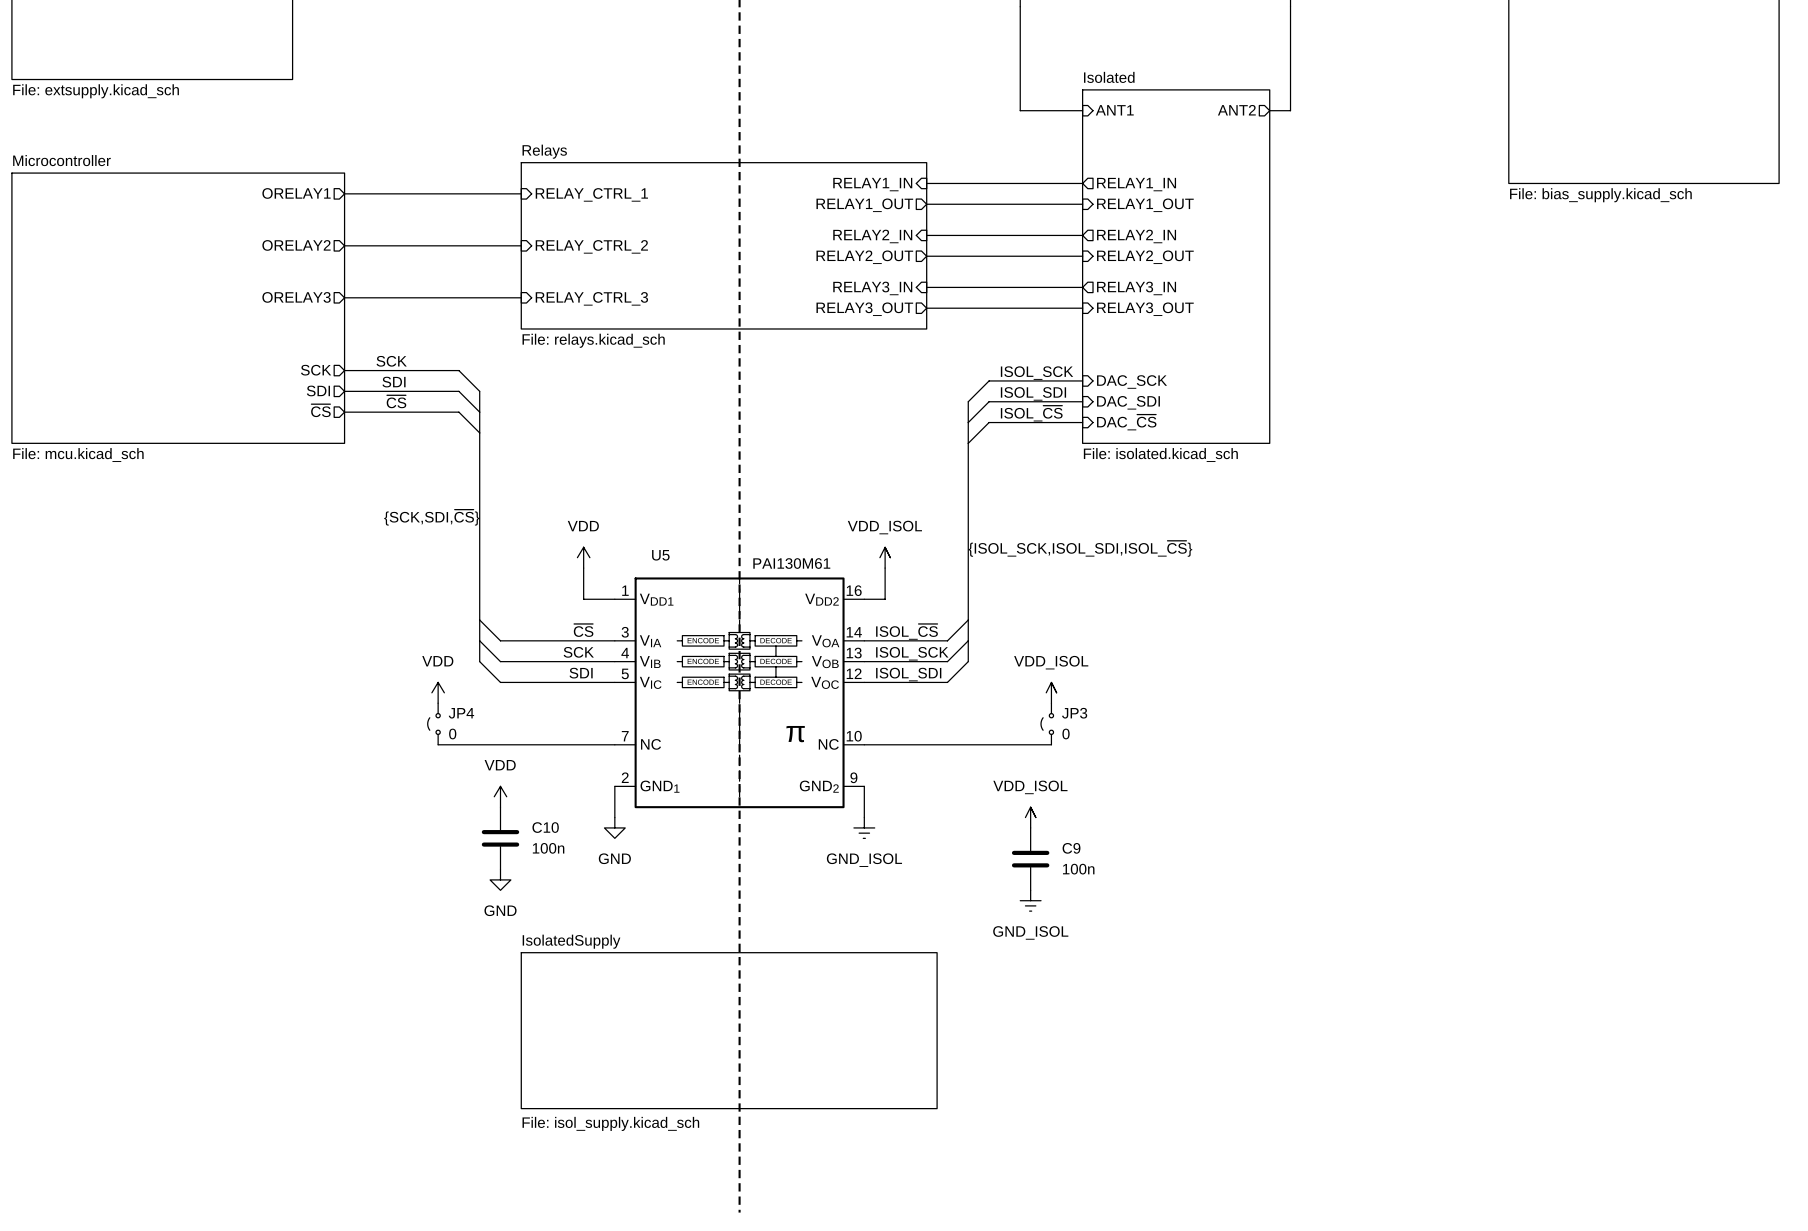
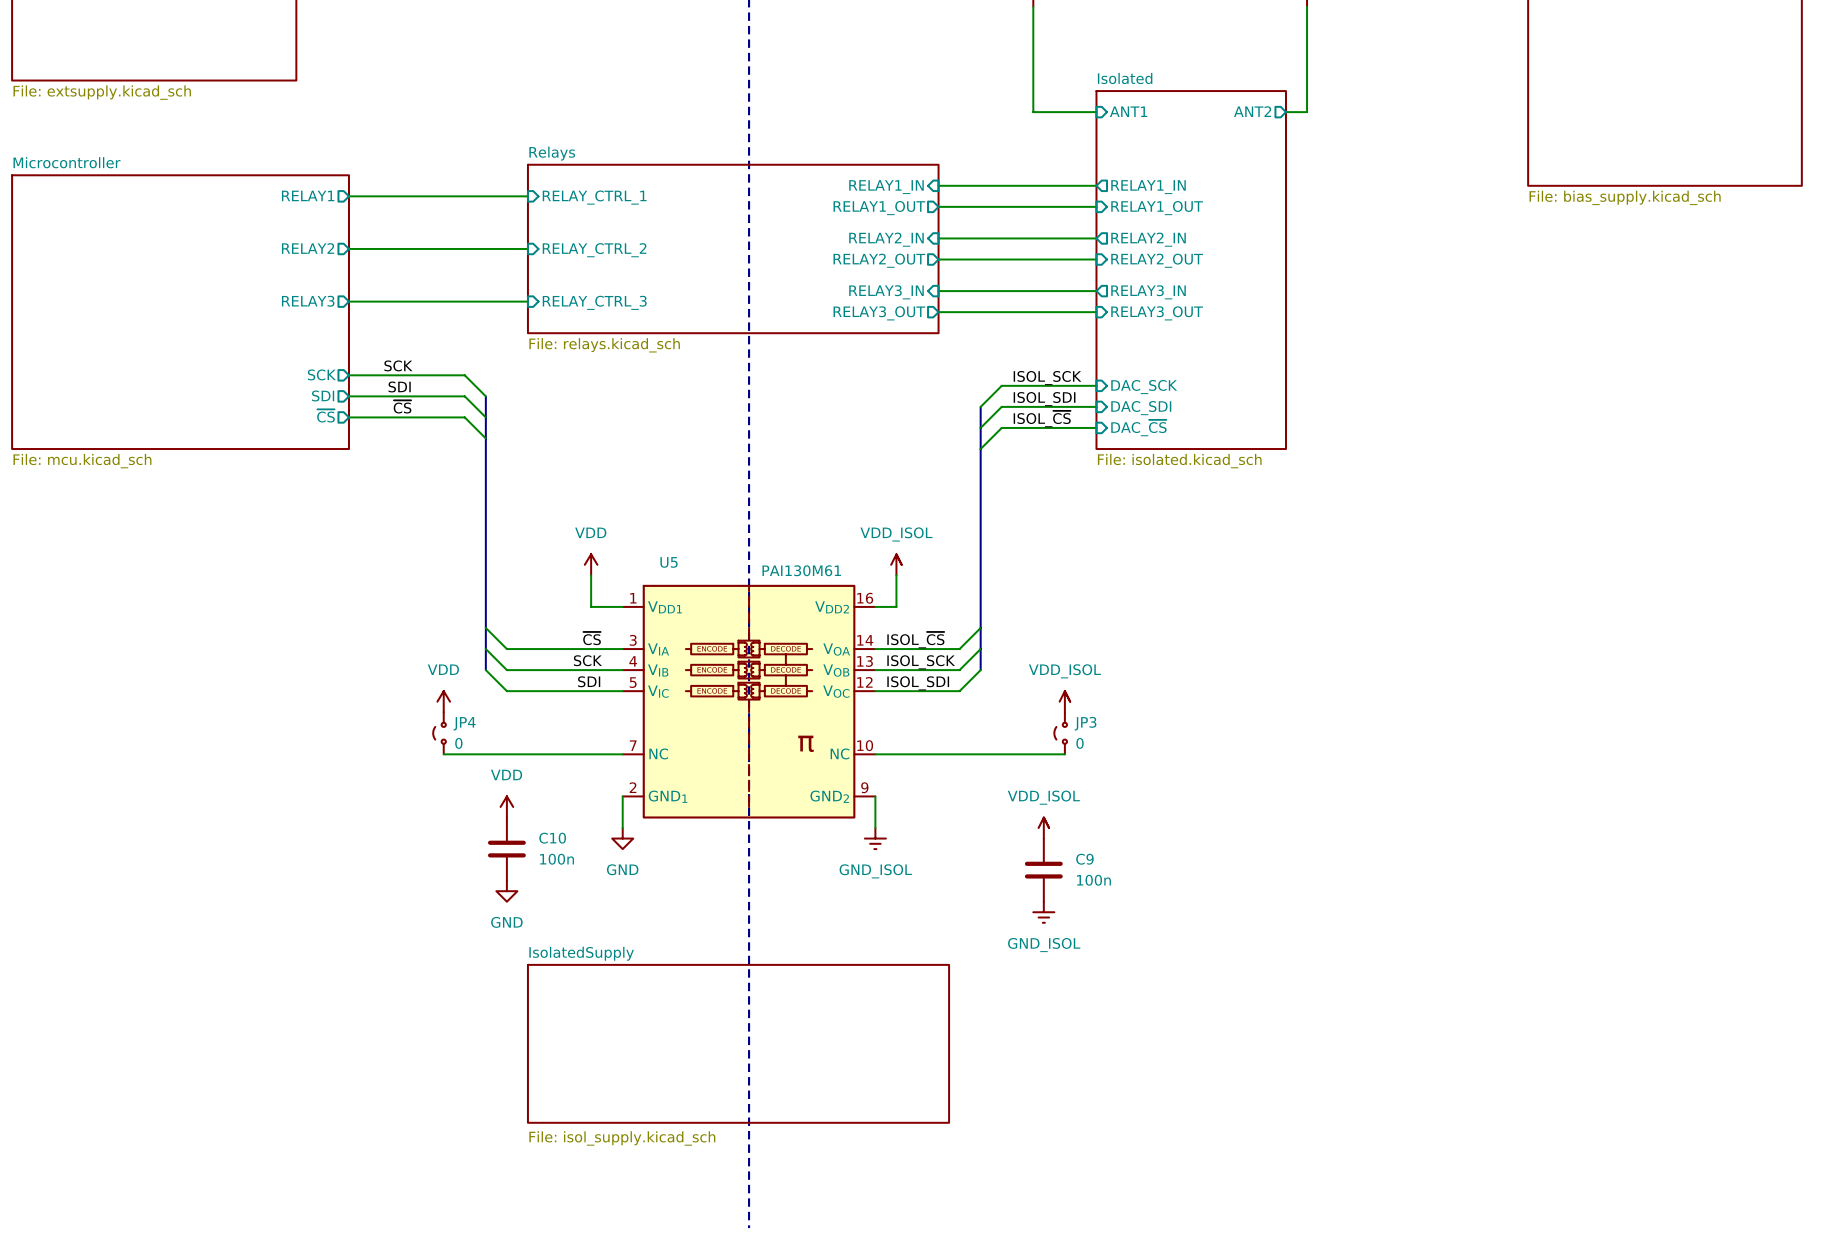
sheet pin: ORELAY1 (296, 193) -> RELAY1 (308, 195)
sheet pin: ORELAY2 (296, 245) -> RELAY2 (308, 248)
sheet pin: ORELAY3 (296, 297) -> RELAY3 (308, 301)
label: {SCK,SDI,~{CS}} (431, 517) -> none
label: {ISOL_SCK,ISOL_SDI,ISOL_~{CS}} (1080, 548) -> none

